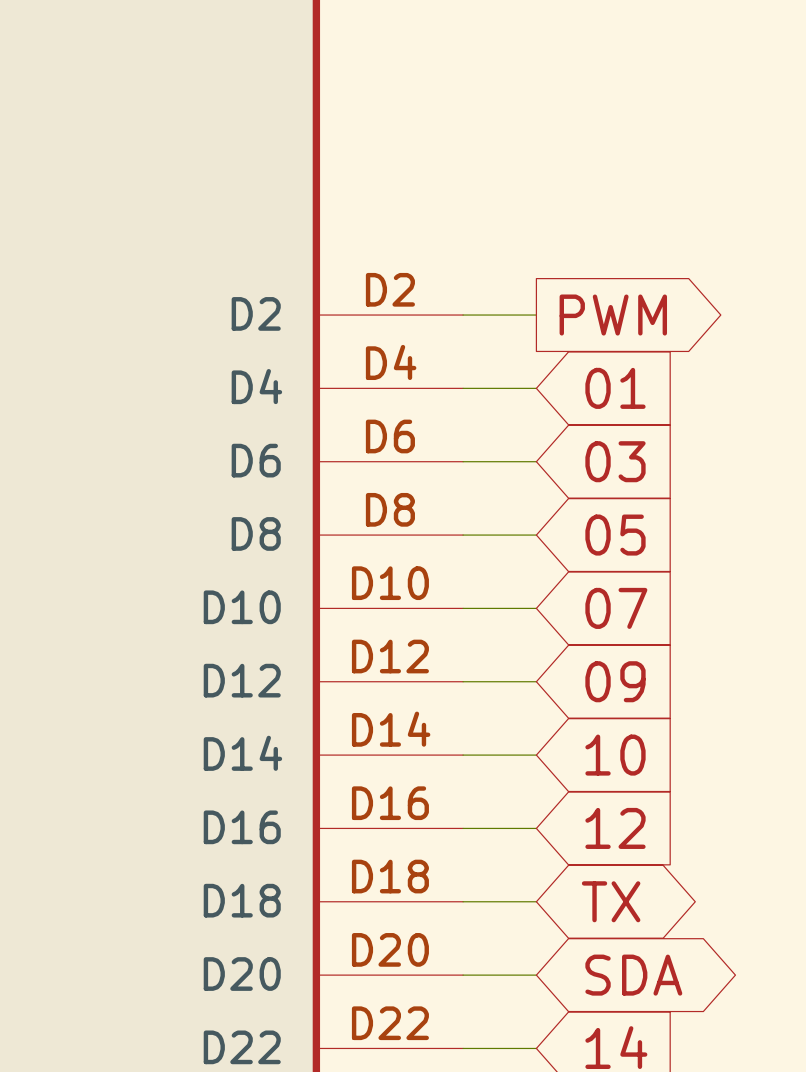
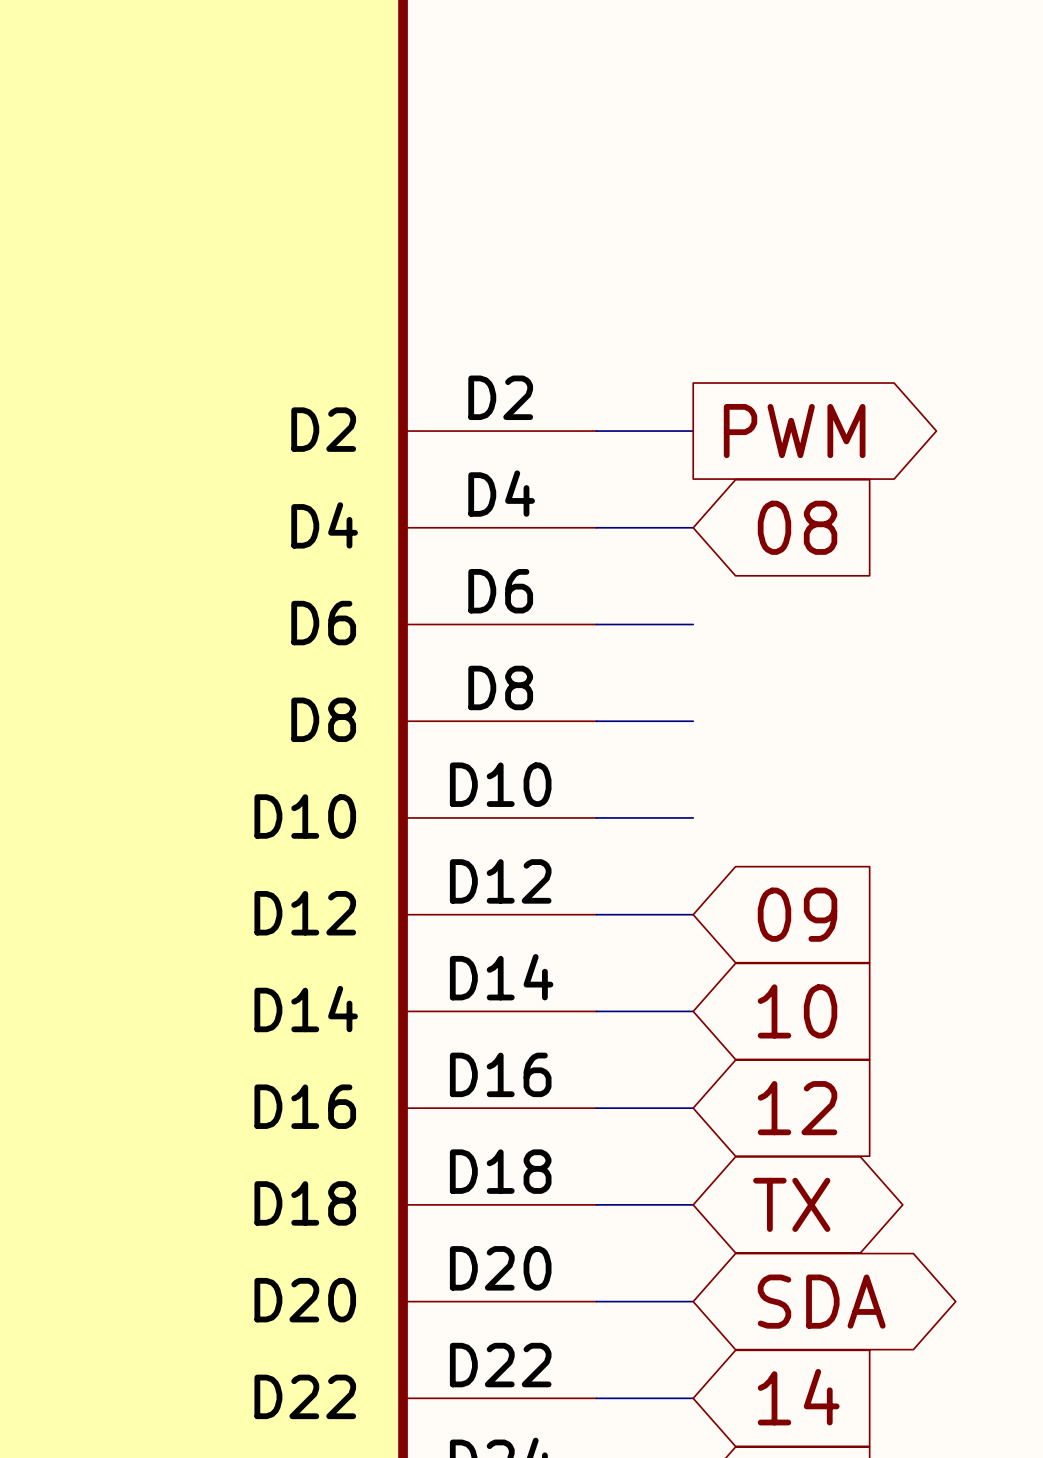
global label: 01 (615, 388) -> 08 (797, 527)
global label: 03 (615, 461) -> none
global label: 05 (615, 535) -> none
global label: 07 (616, 608) -> none

